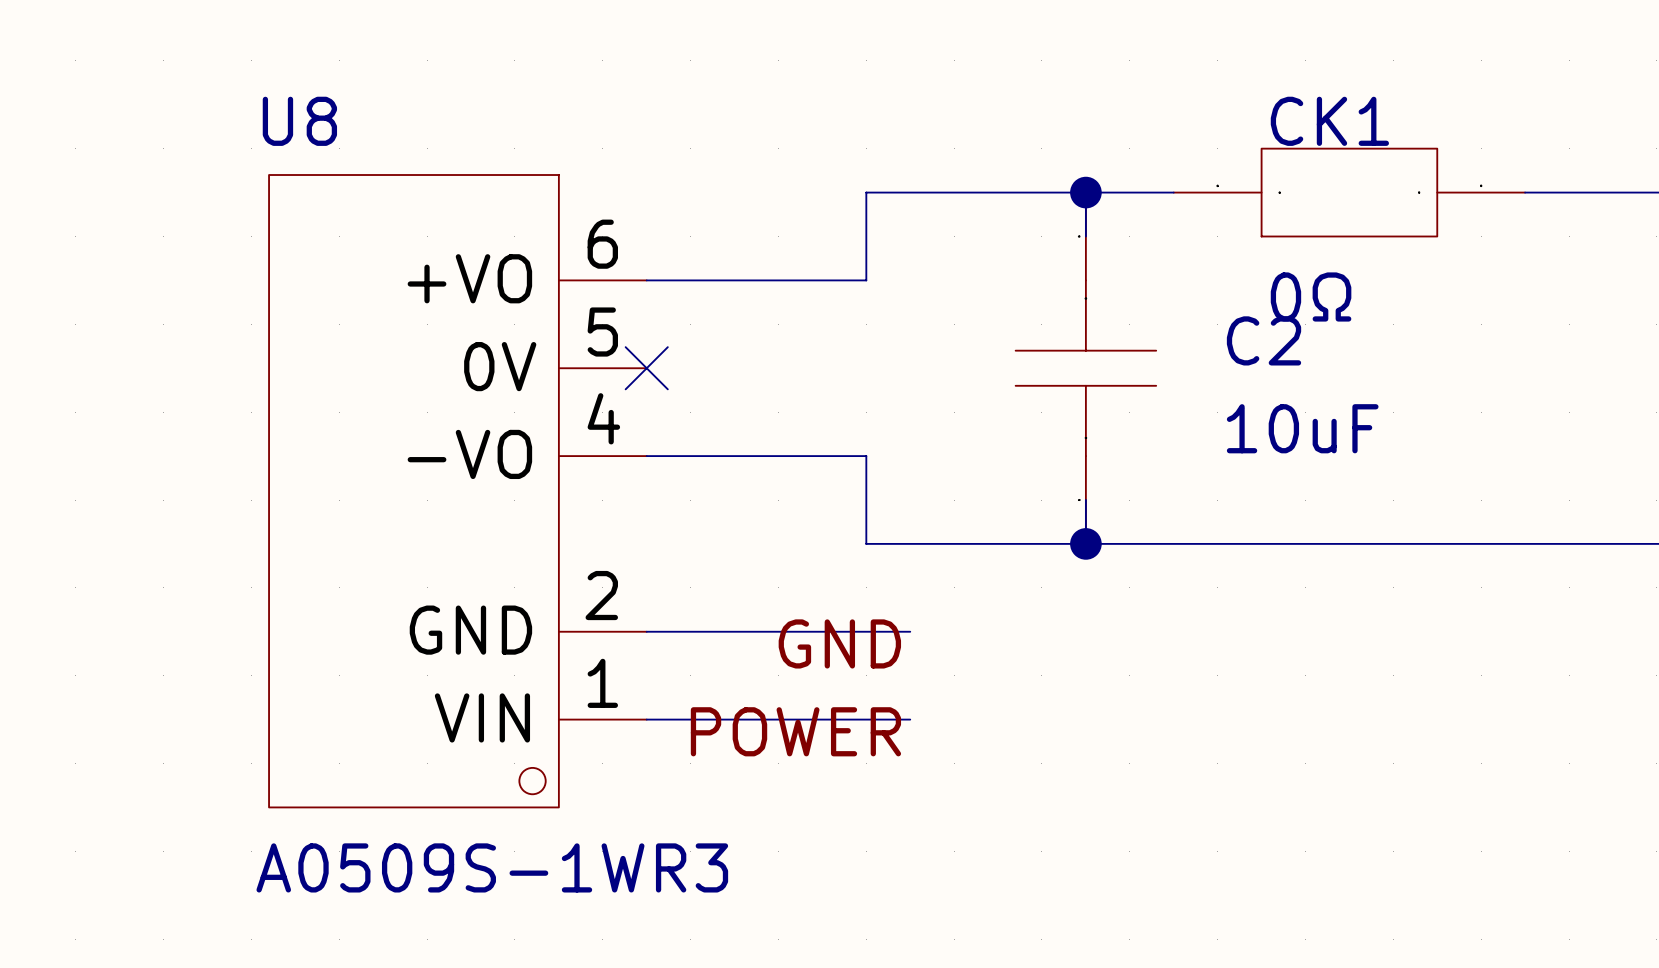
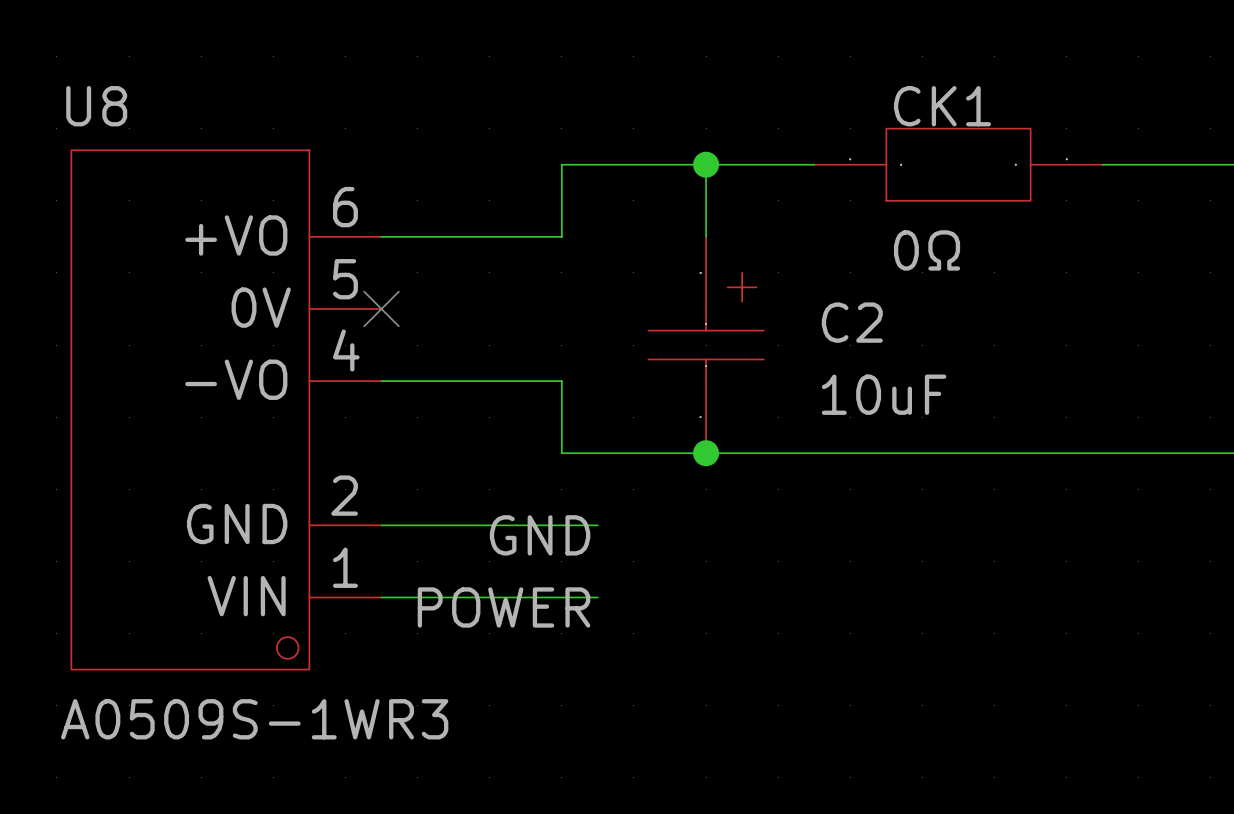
C2 symbol: [1015, 192, 1157, 544] -> [648, 236, 764, 454]
wire: none -> (706, 164) (706, 236)
wire: (1085, 192) (1085, 236) -> none
junction position: (1085, 192) -> (706, 164)
wire: (1085, 500) (1085, 543) -> none
junction position: (1085, 543) -> (706, 453)

